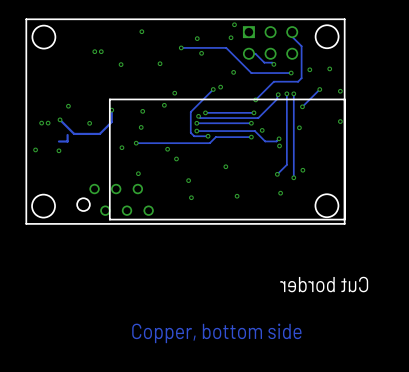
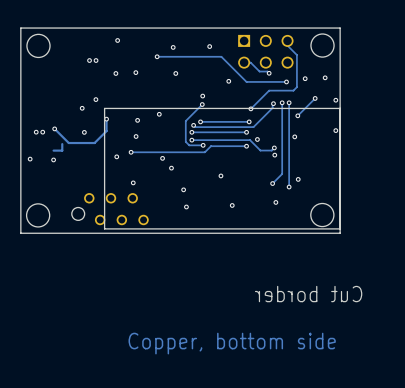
via: (234, 24) -> none
via: none -> (117, 40)
via: (141, 31) -> none
via: none -> (209, 46)
via: (231, 37) -> none
via: none -> (173, 47)
via: (197, 38) -> none
via: none -> (157, 56)
track: none -> (176, 56) (157, 56)
via: (181, 47) -> none
via: (201, 53) -> none
via: none -> (135, 72)
via: (160, 63) -> none
via: none -> (175, 73)
via: none -> (202, 96)
via: (220, 87) -> none
track: (213, 89) (207, 95) -> none
via: (213, 89) -> none
via: none -> (95, 99)
via: (174, 93) -> none
via: none -> (202, 104)
via: none -> (82, 108)
via: (68, 106) -> none

